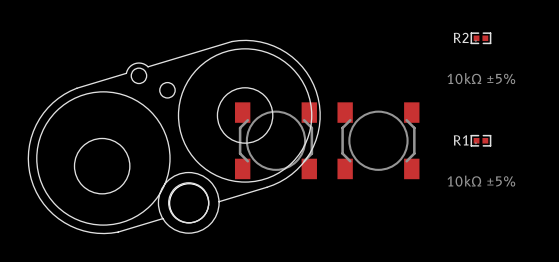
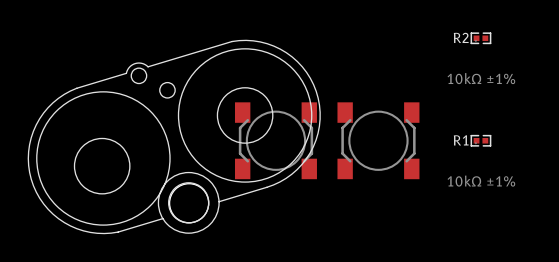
R2 value: 10kΩ ±5% (481, 78) -> 10kΩ ±1% (481, 78)
R1 value: 10kΩ ±5% (481, 181) -> 10kΩ ±1% (481, 181)

